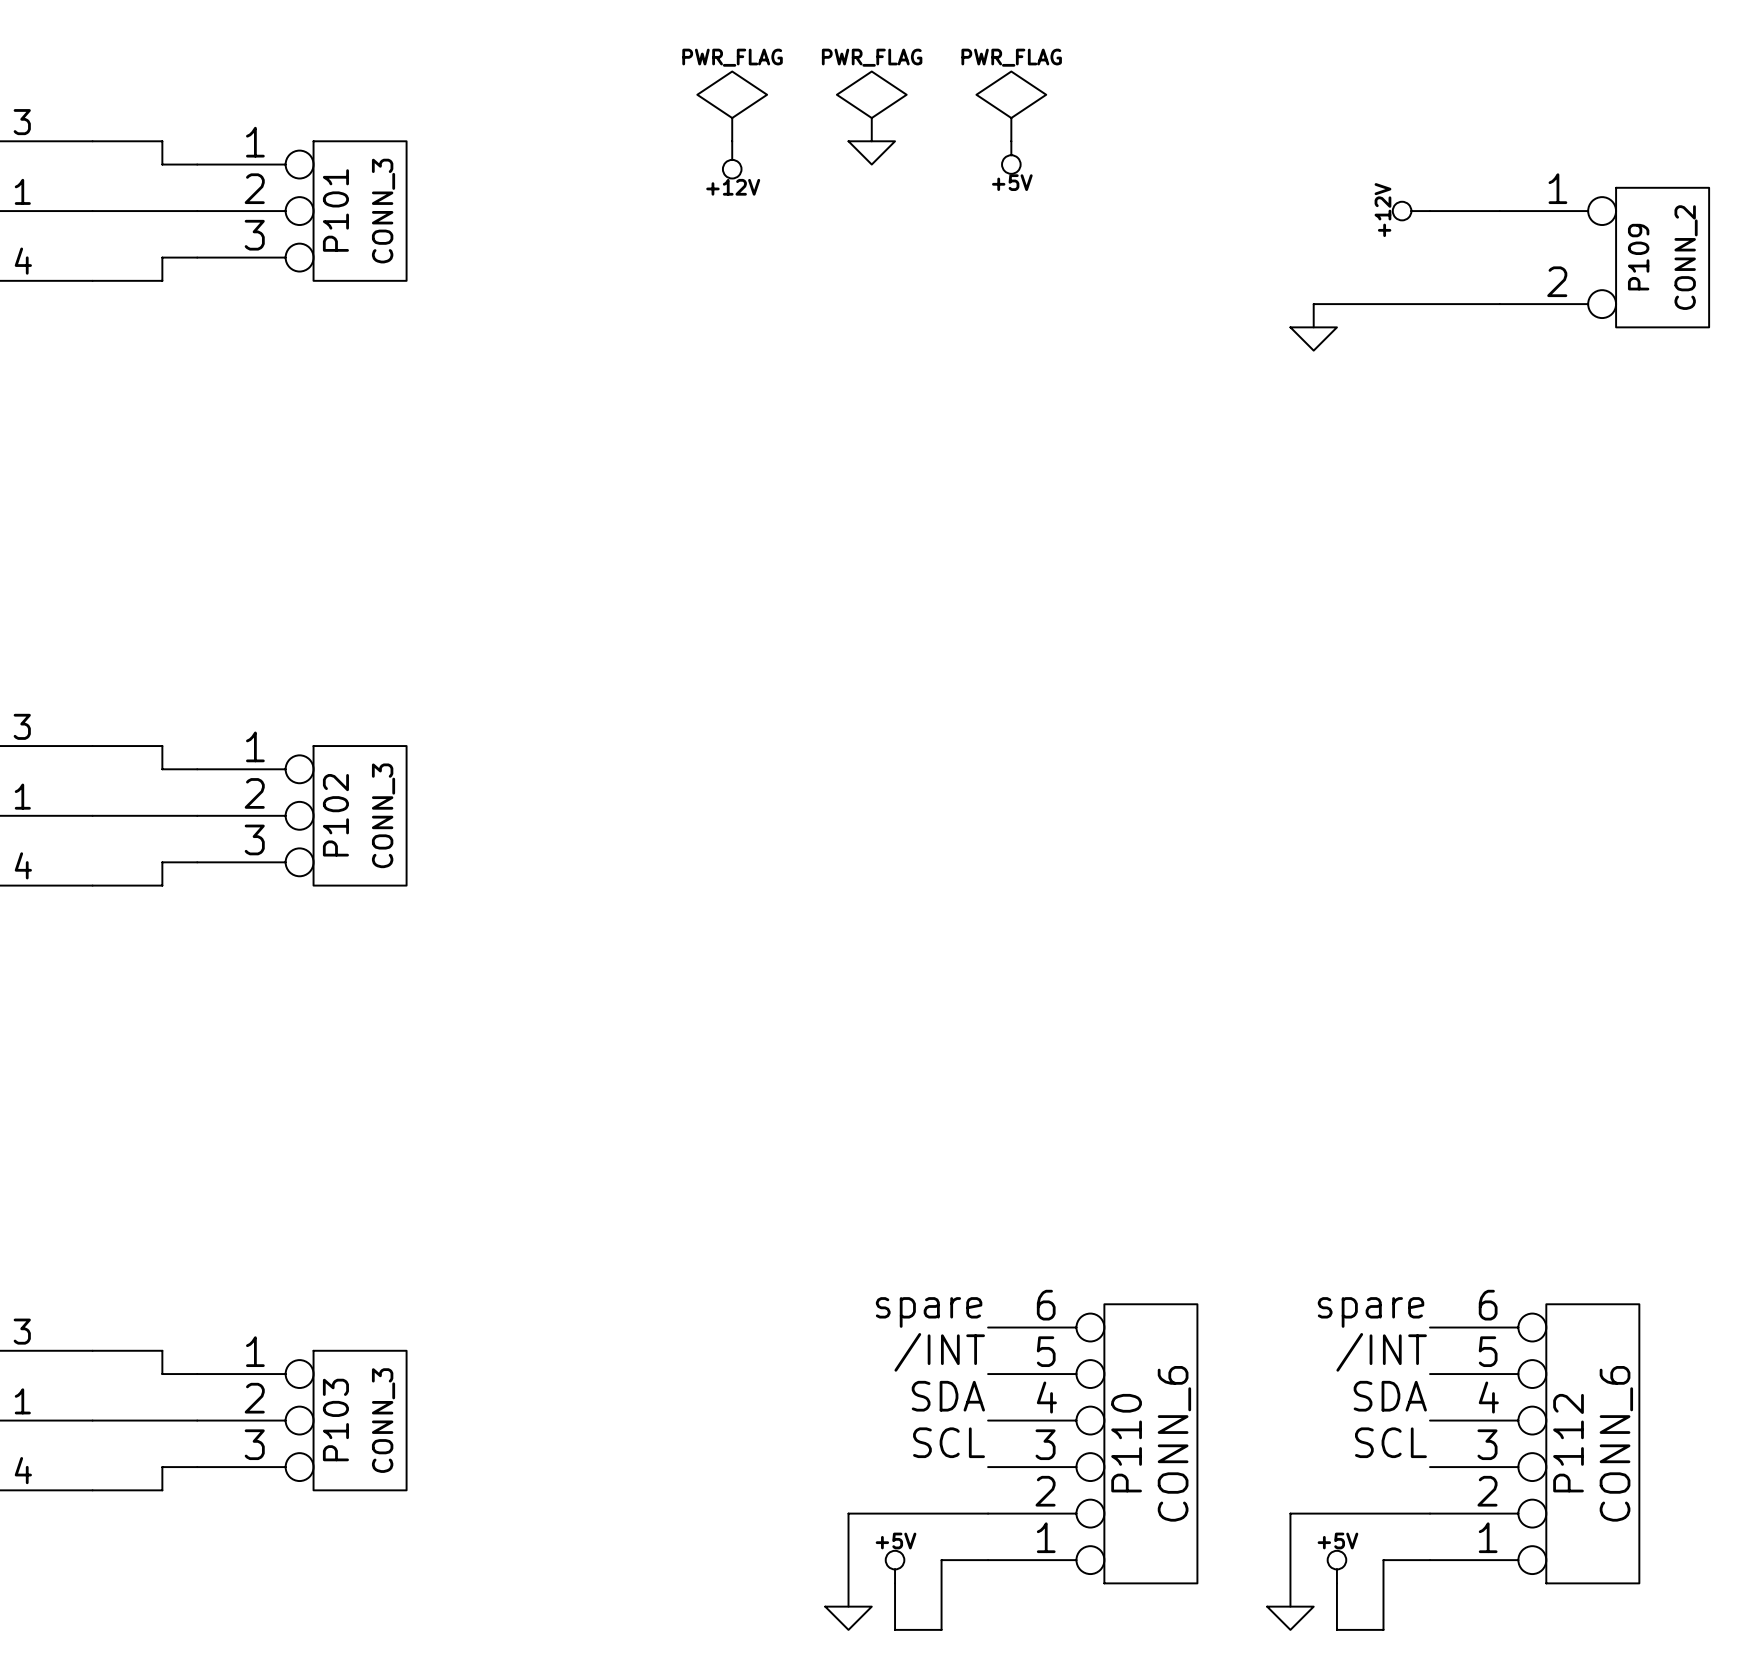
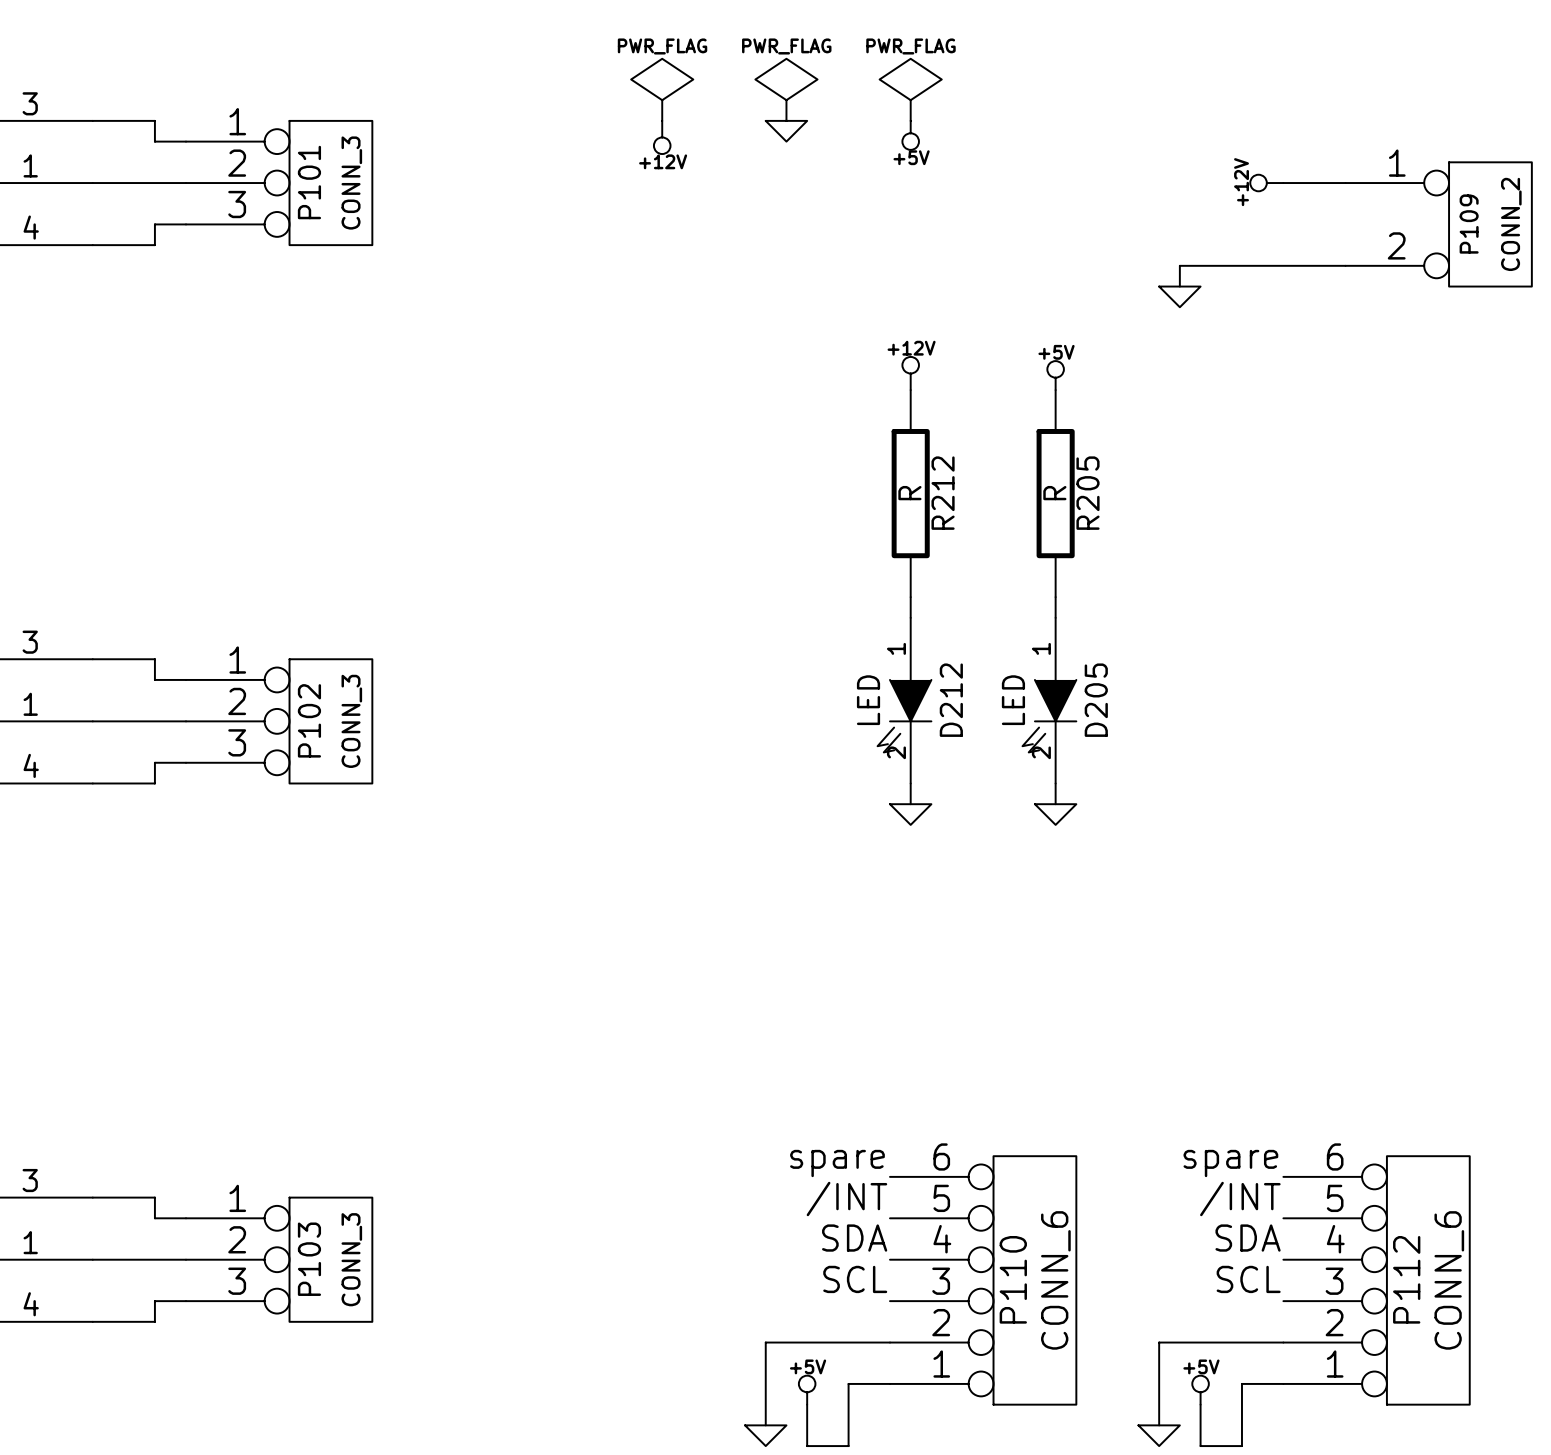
power symbol: none -> +12V (910, 373)
power symbol: none -> +5V (1055, 375)
R212: none -> R (910, 493)
R205: none -> R (1055, 493)
wire: none -> (910, 597) (910, 617)
wire: none -> (1055, 597) (1055, 617)
D212: none -> LED (904, 700)
D205: none -> LED (1049, 700)
wire: none -> (910, 783) (910, 804)
wire: none -> (1055, 783) (1055, 804)
power symbol: none -> (910, 814)
power symbol: none -> (1055, 814)

